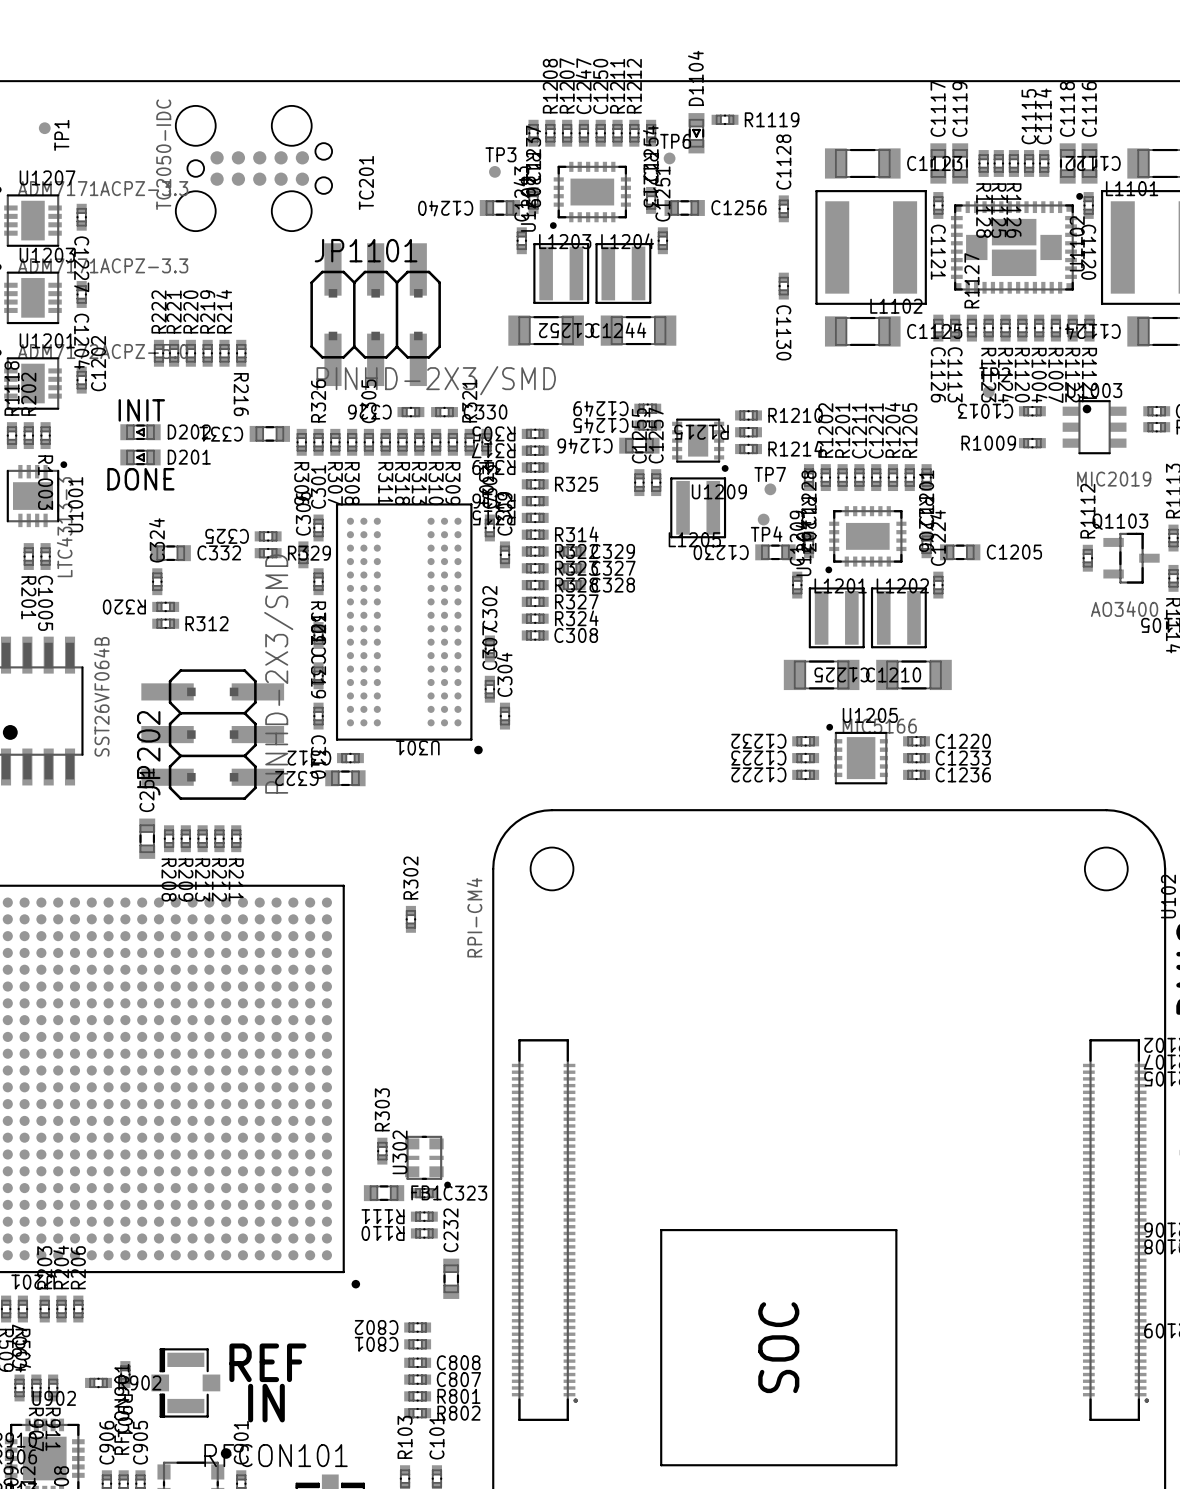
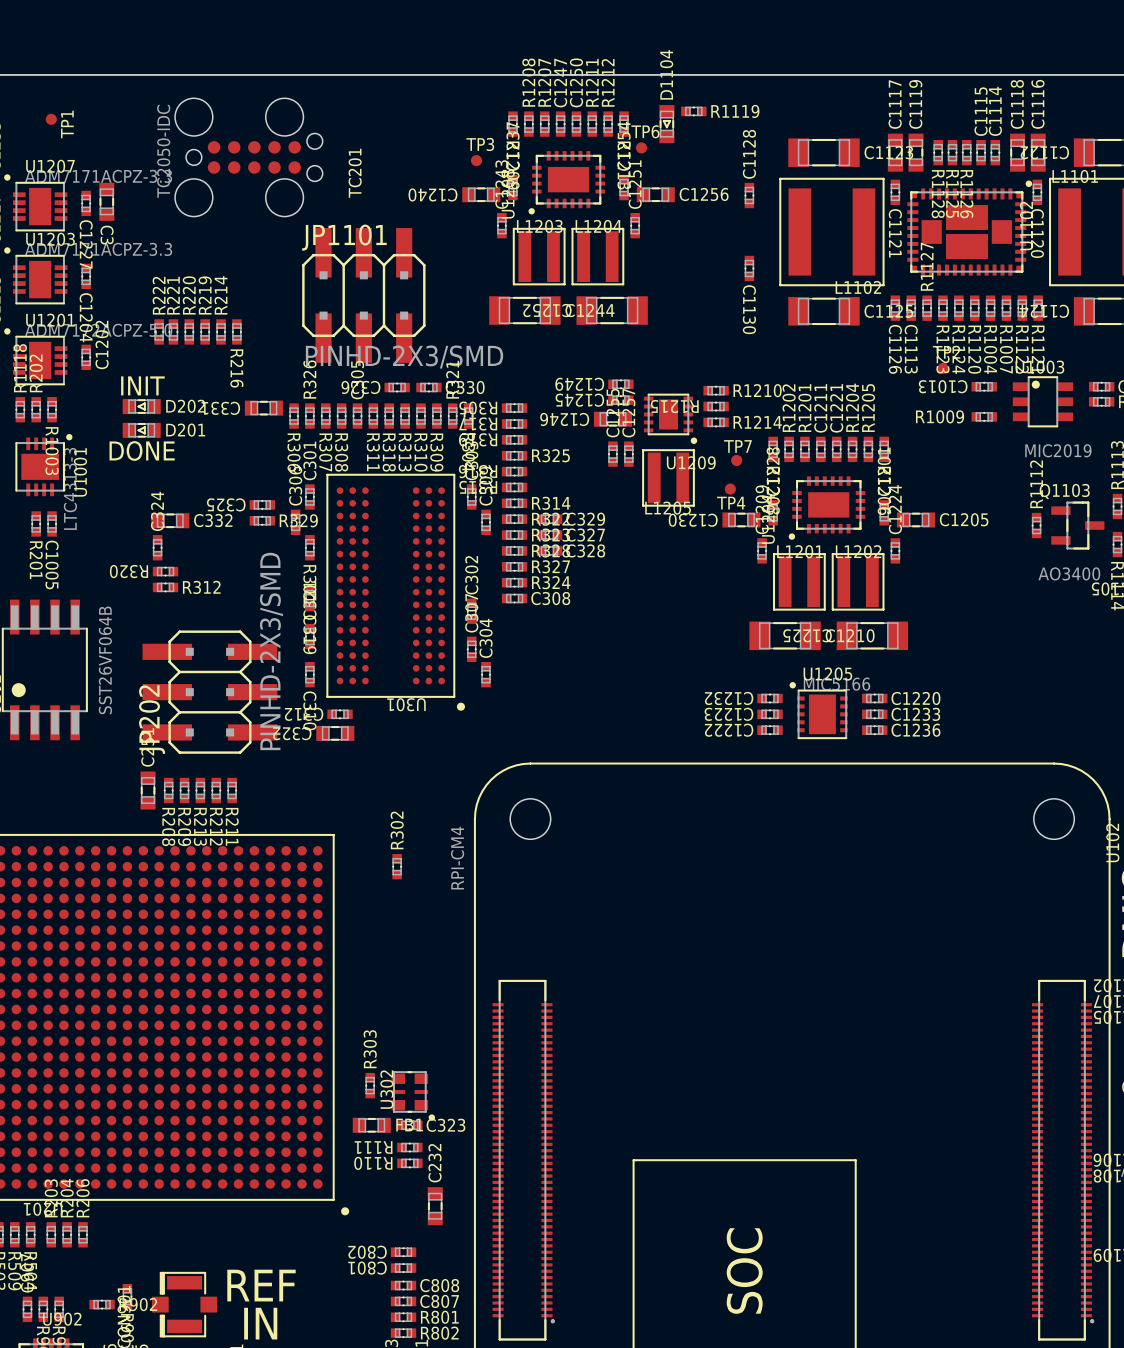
C3: none -> (106, 201)

